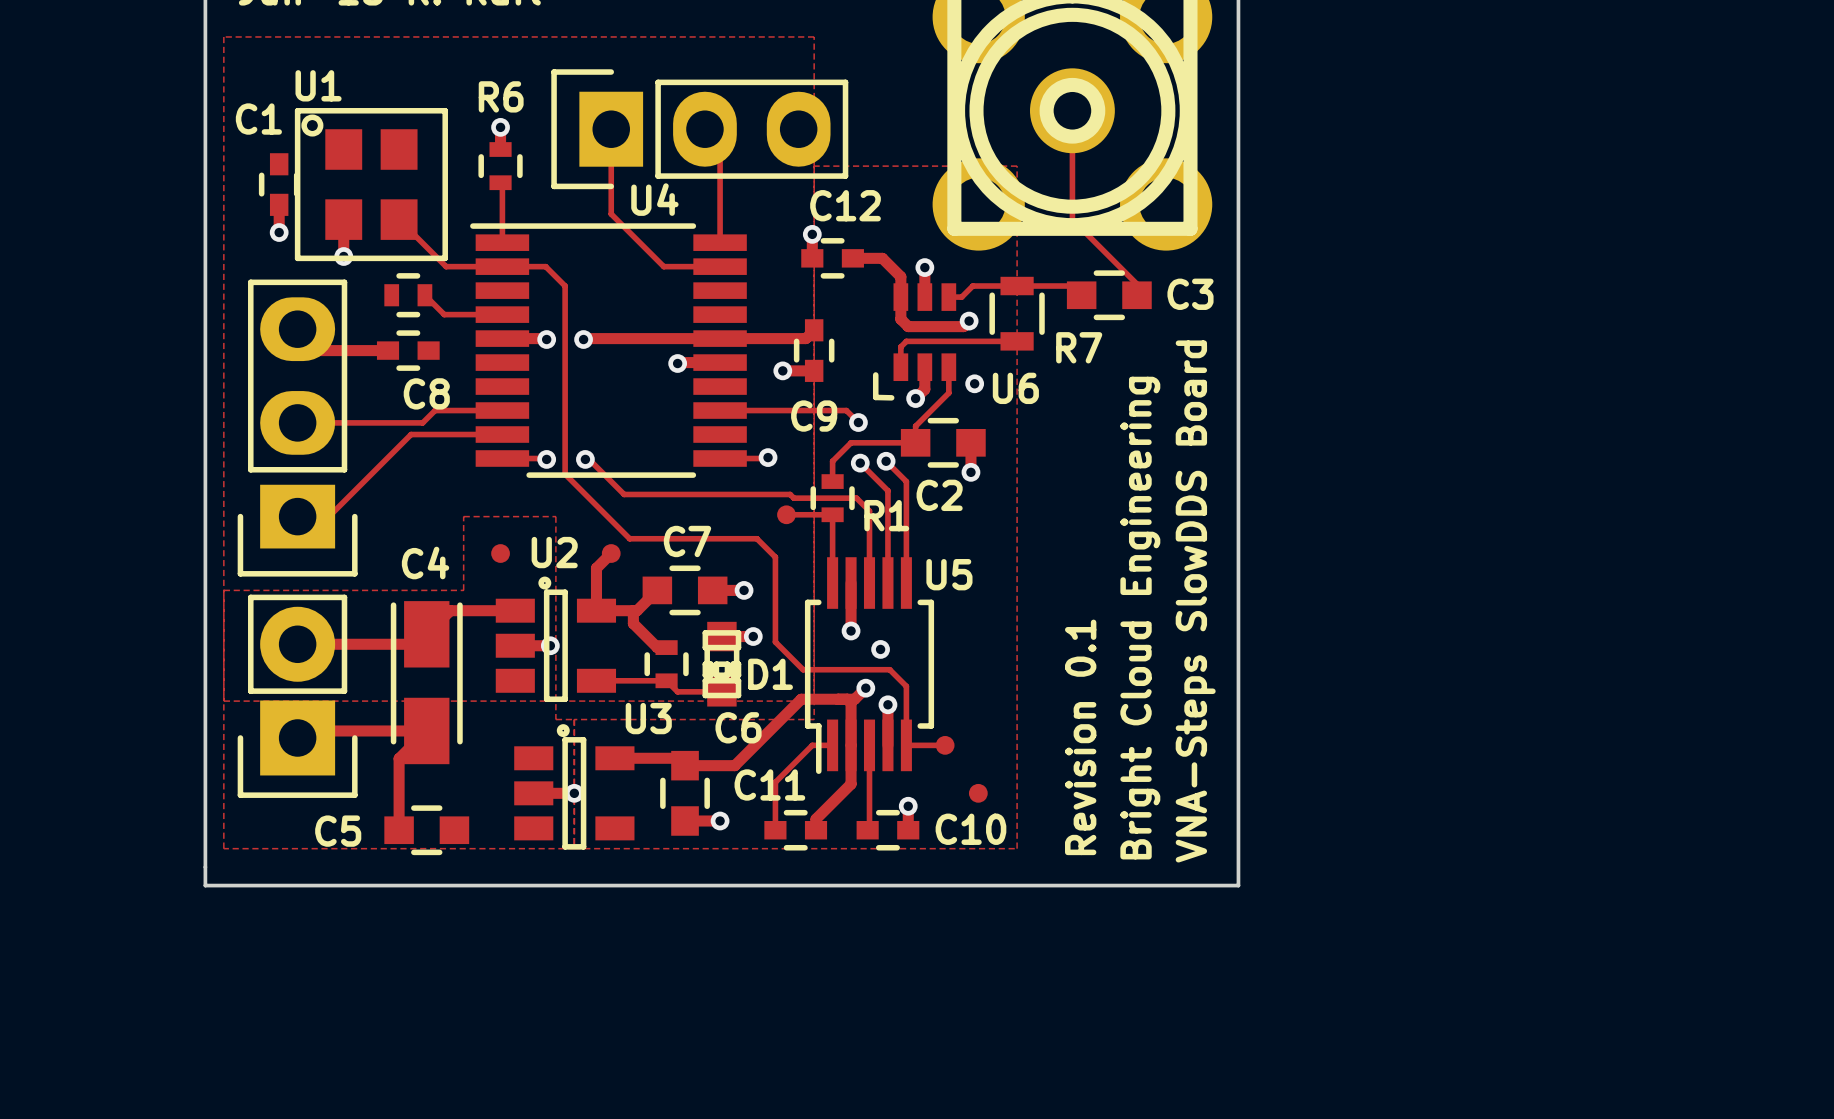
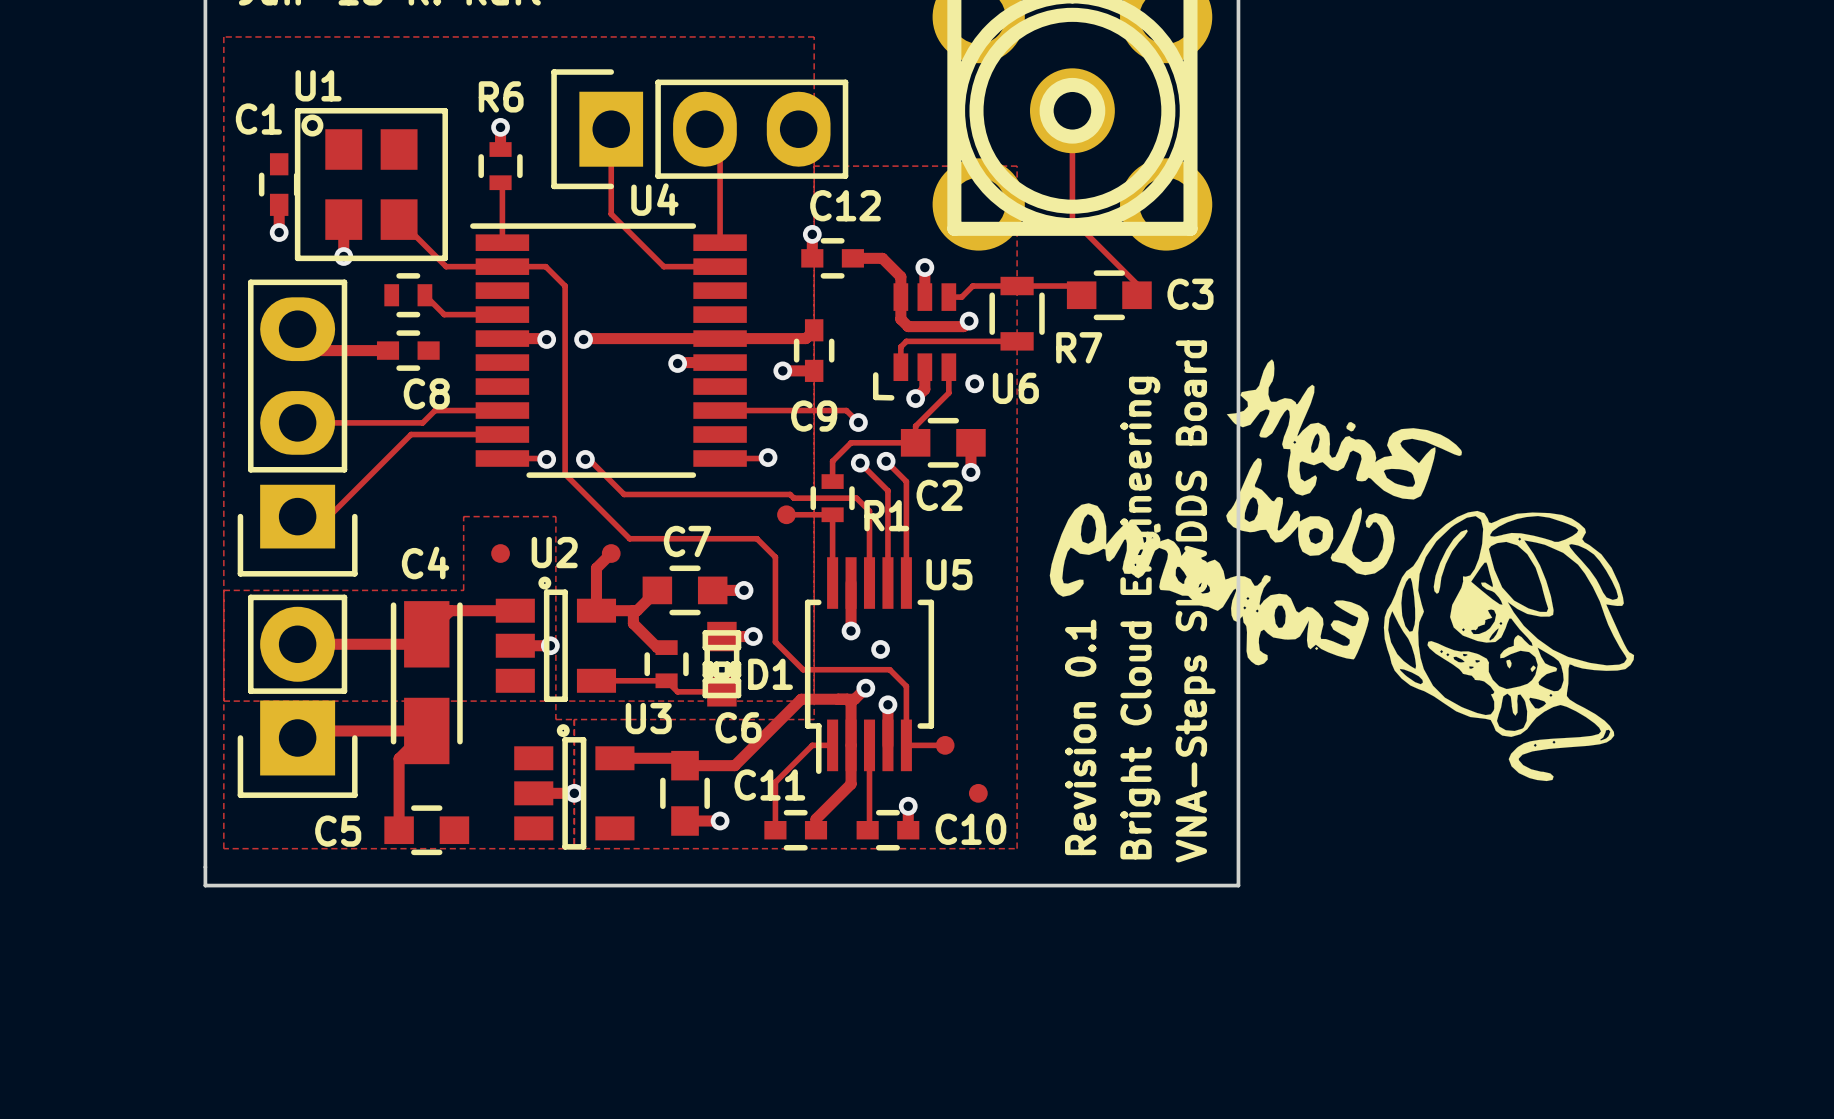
drawing: none -> [1049, 359, 1635, 782]

